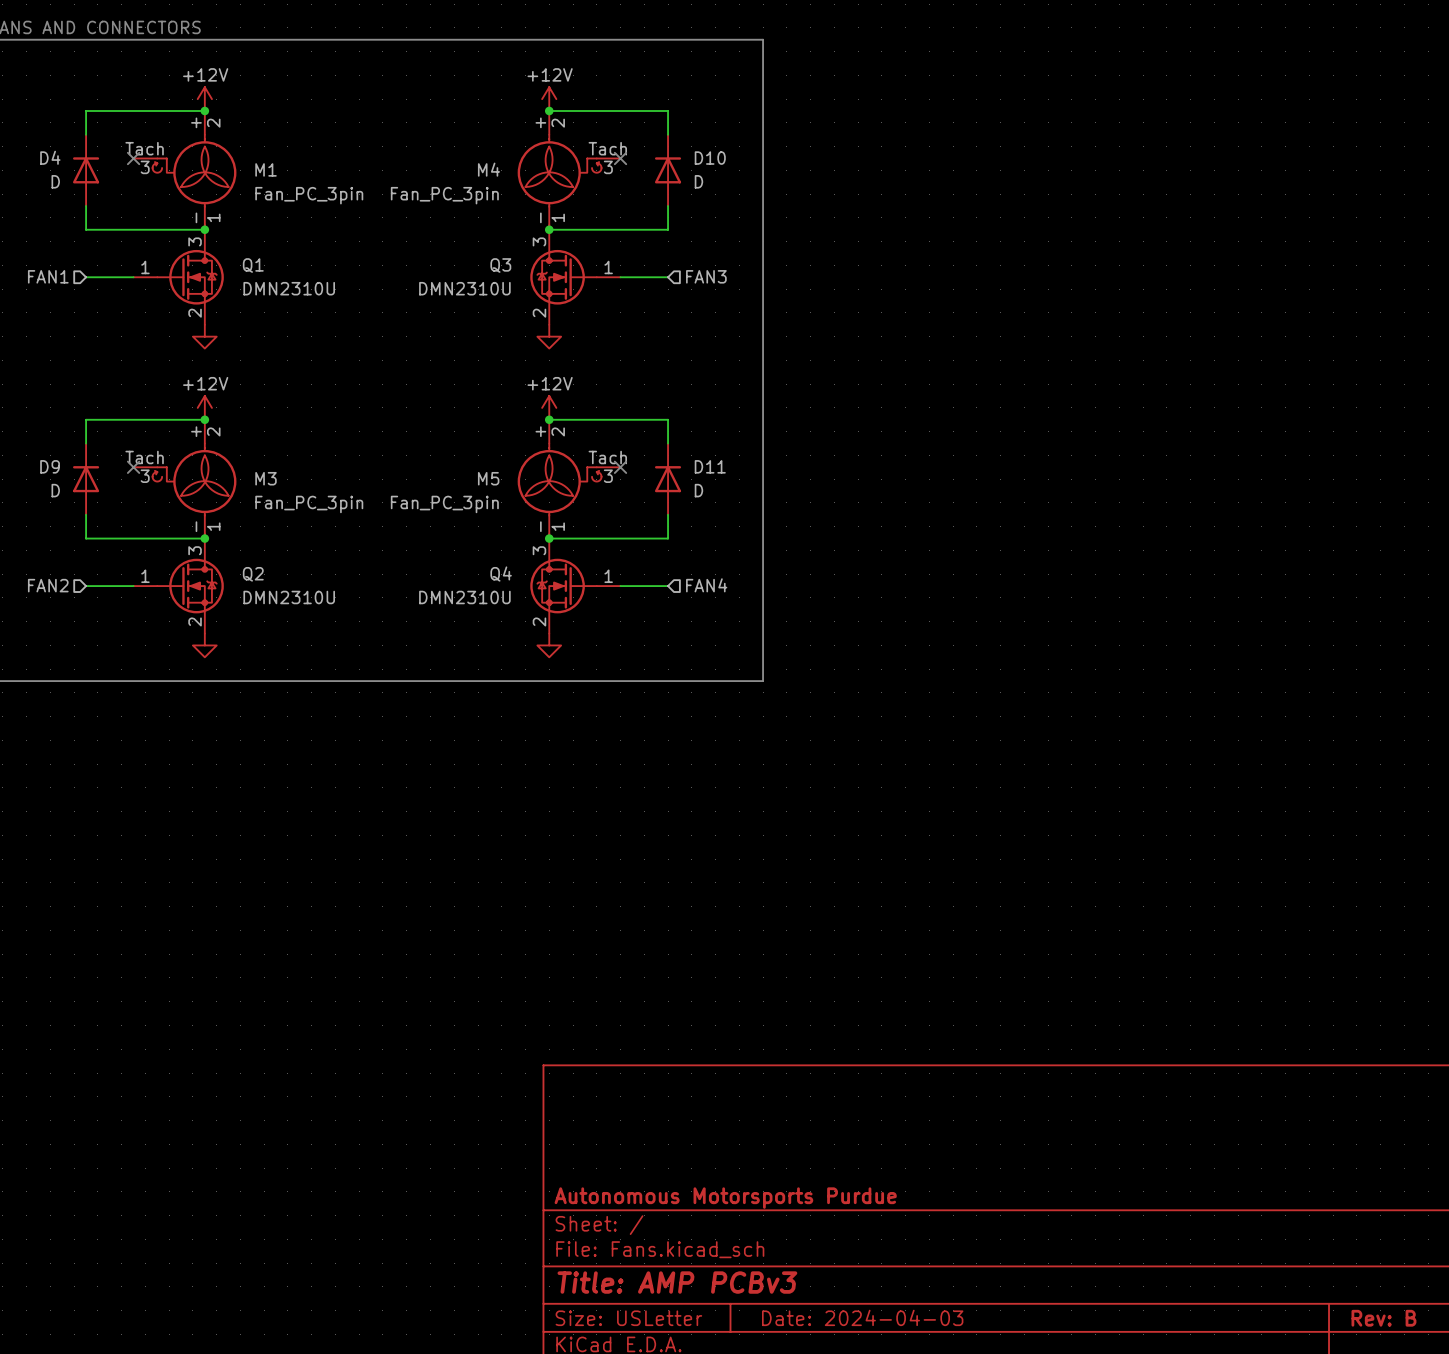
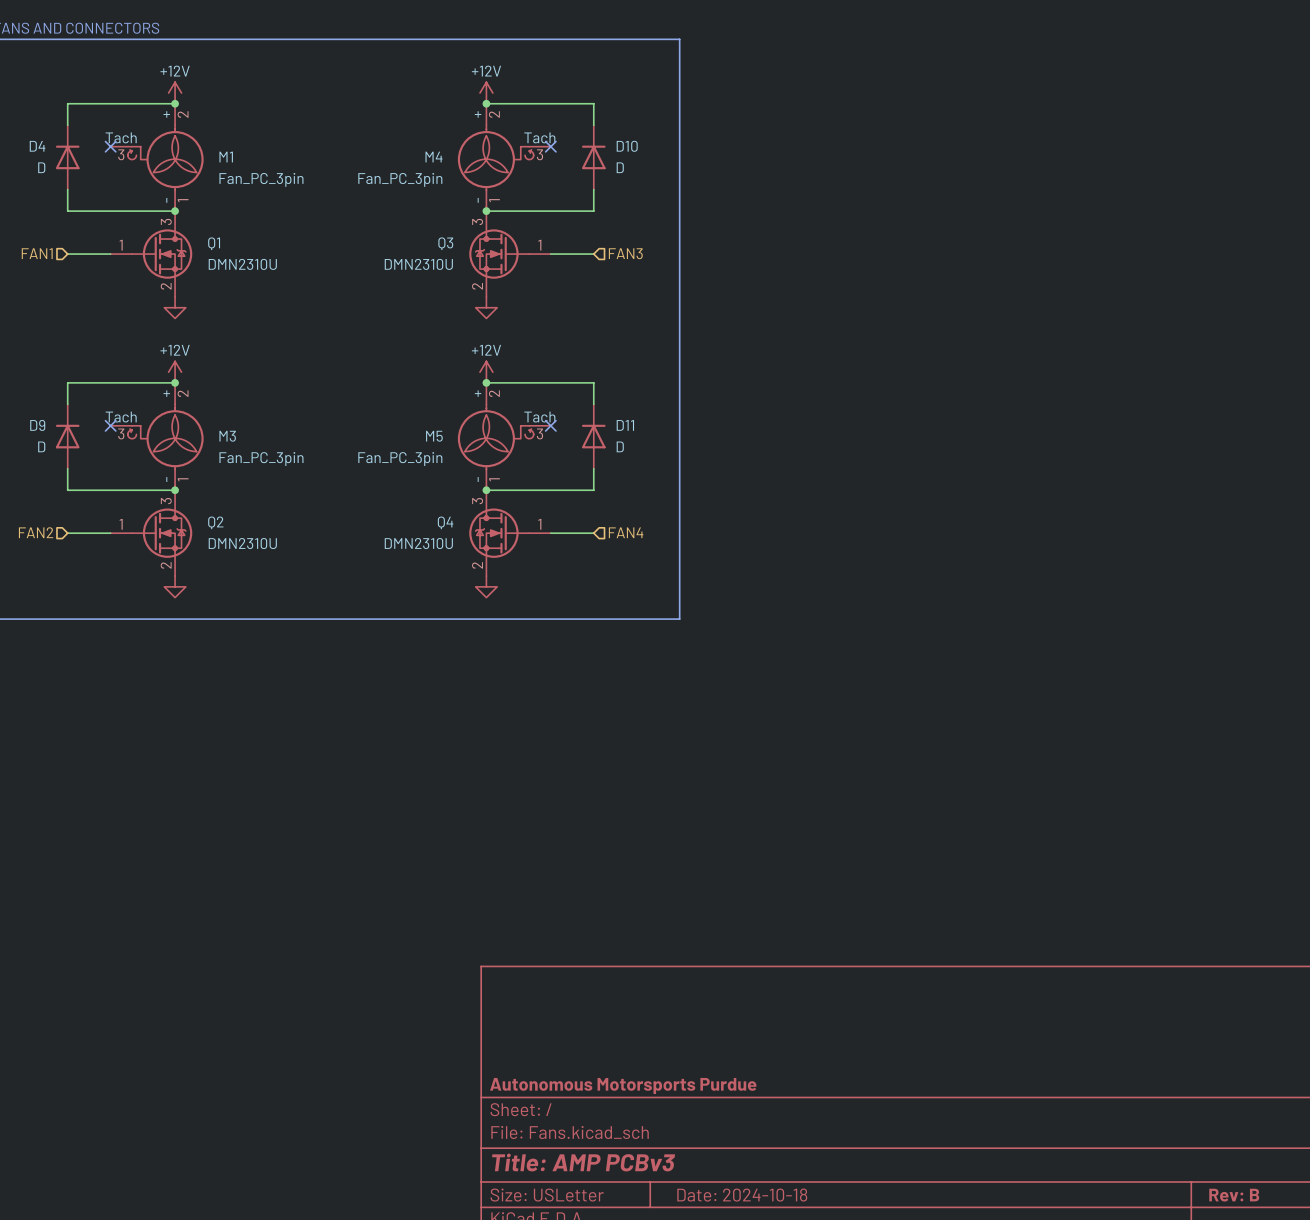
title block: Date: 2024-04-03 (862, 1317) -> Date: 2024-10-18 (742, 1195)

